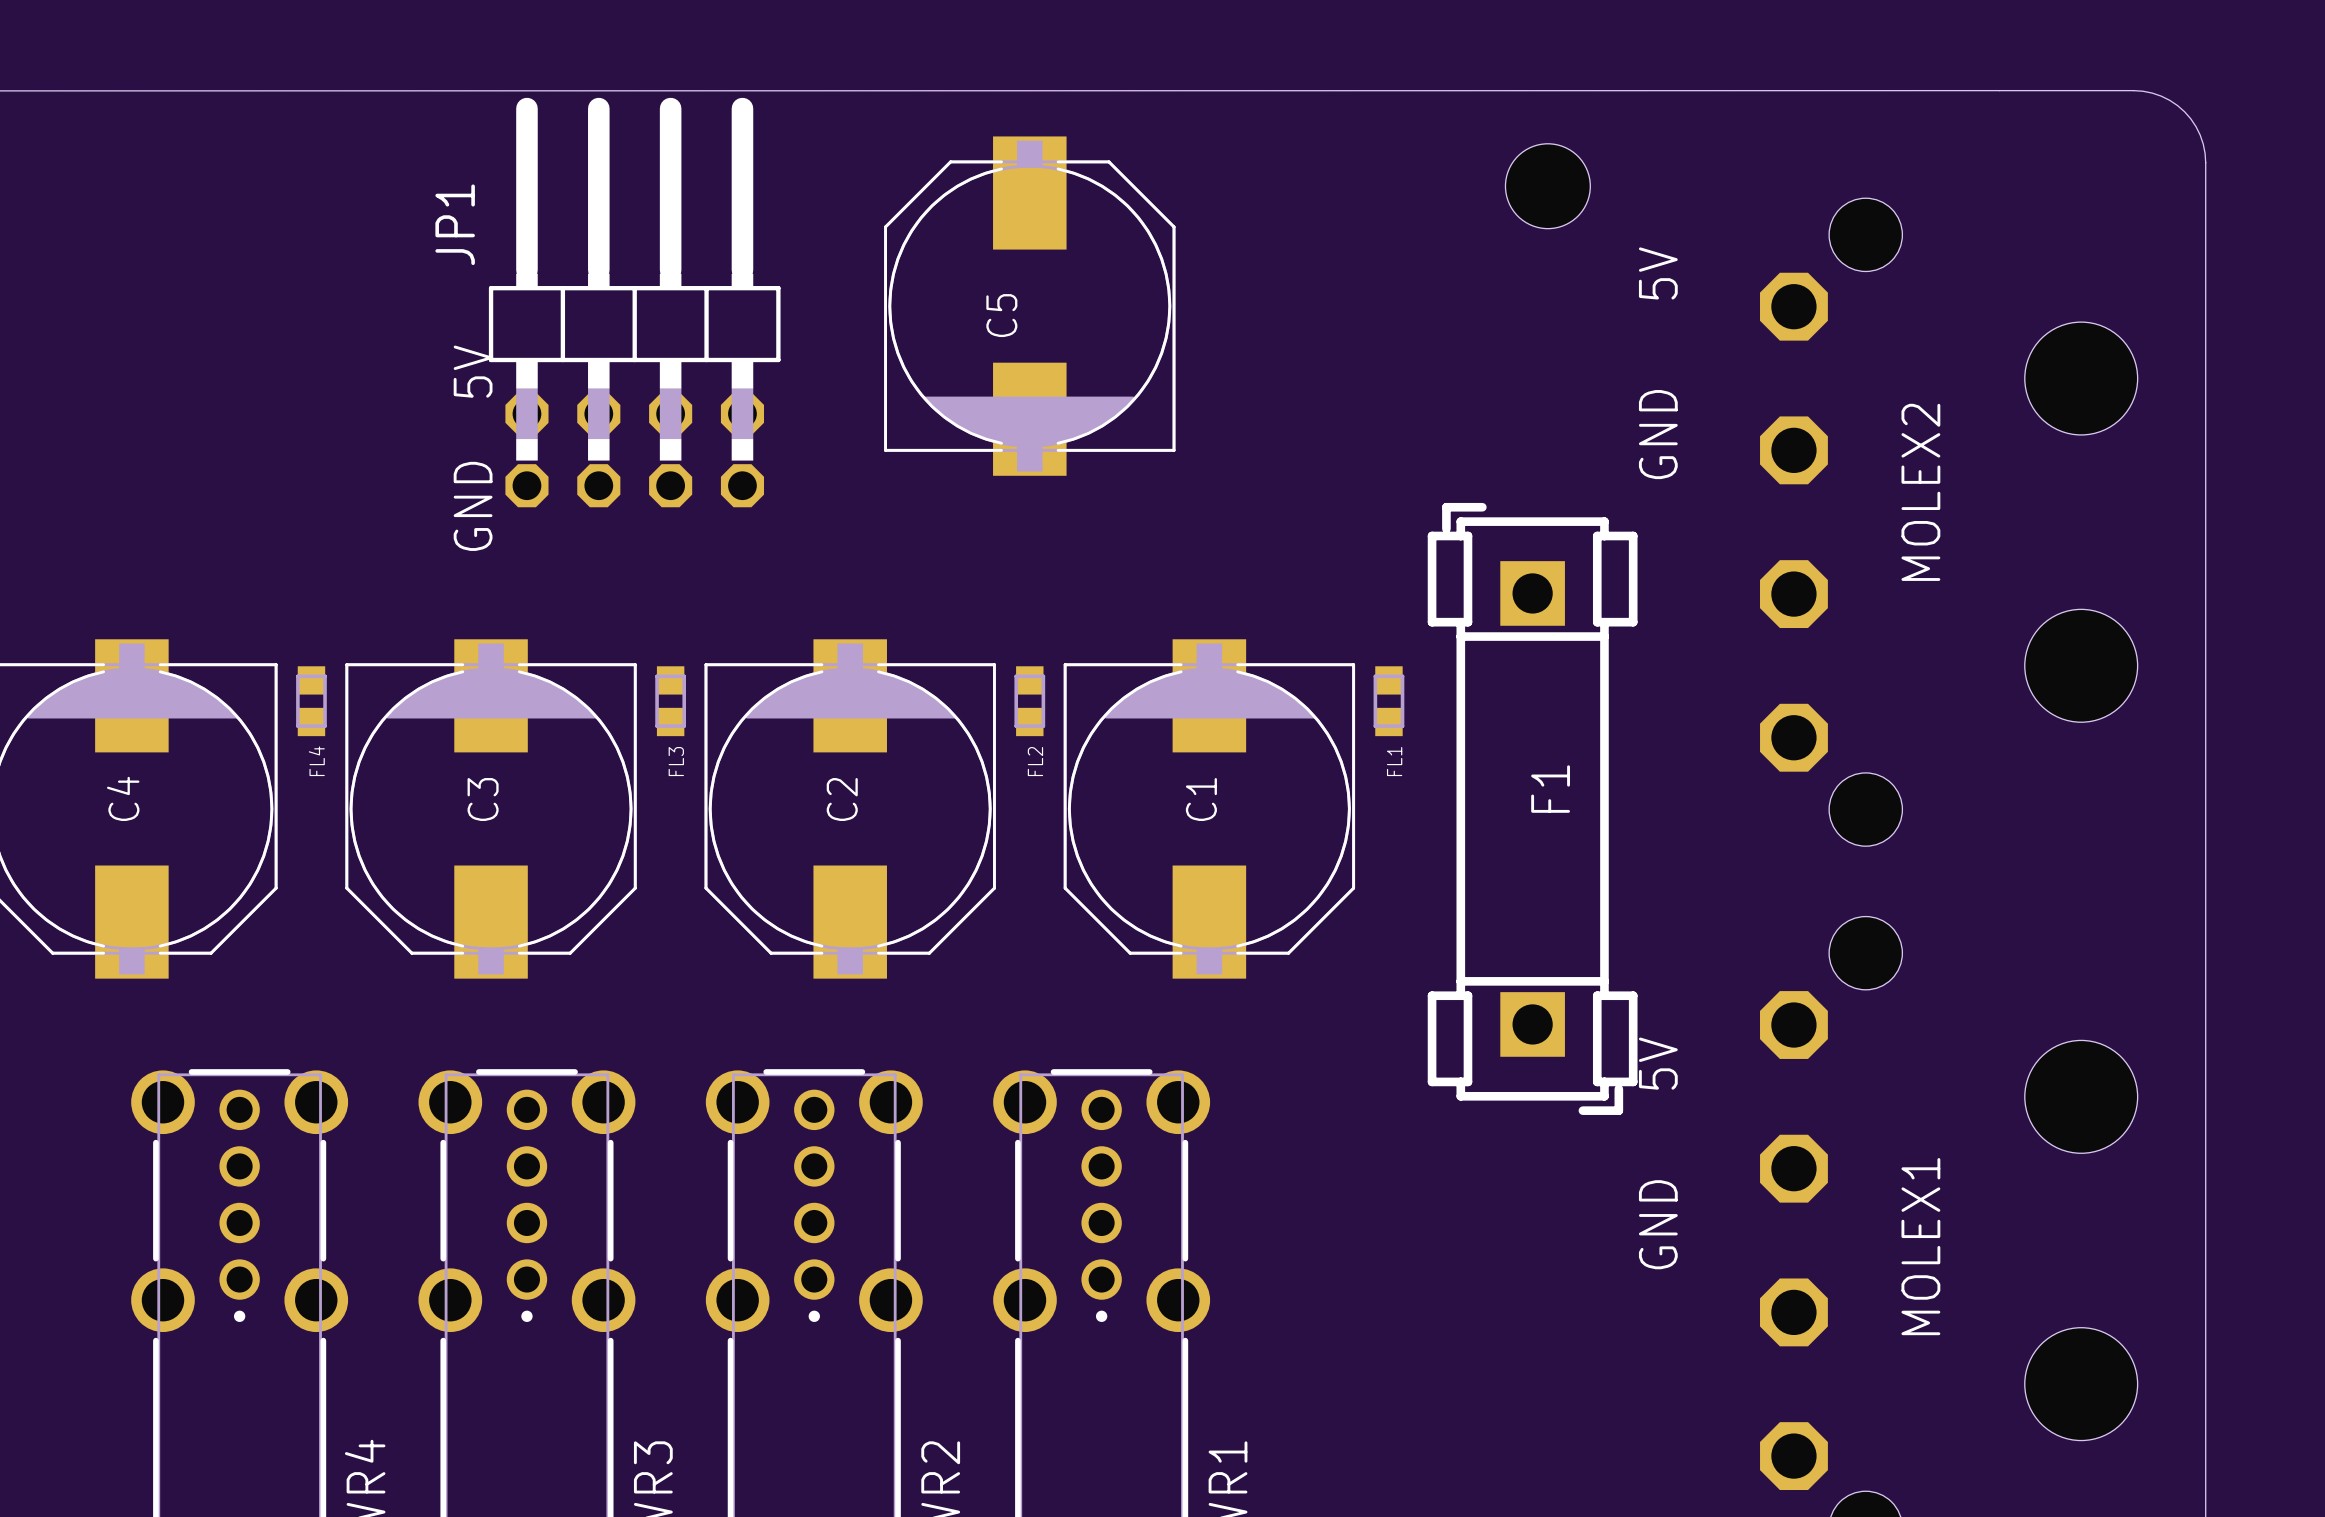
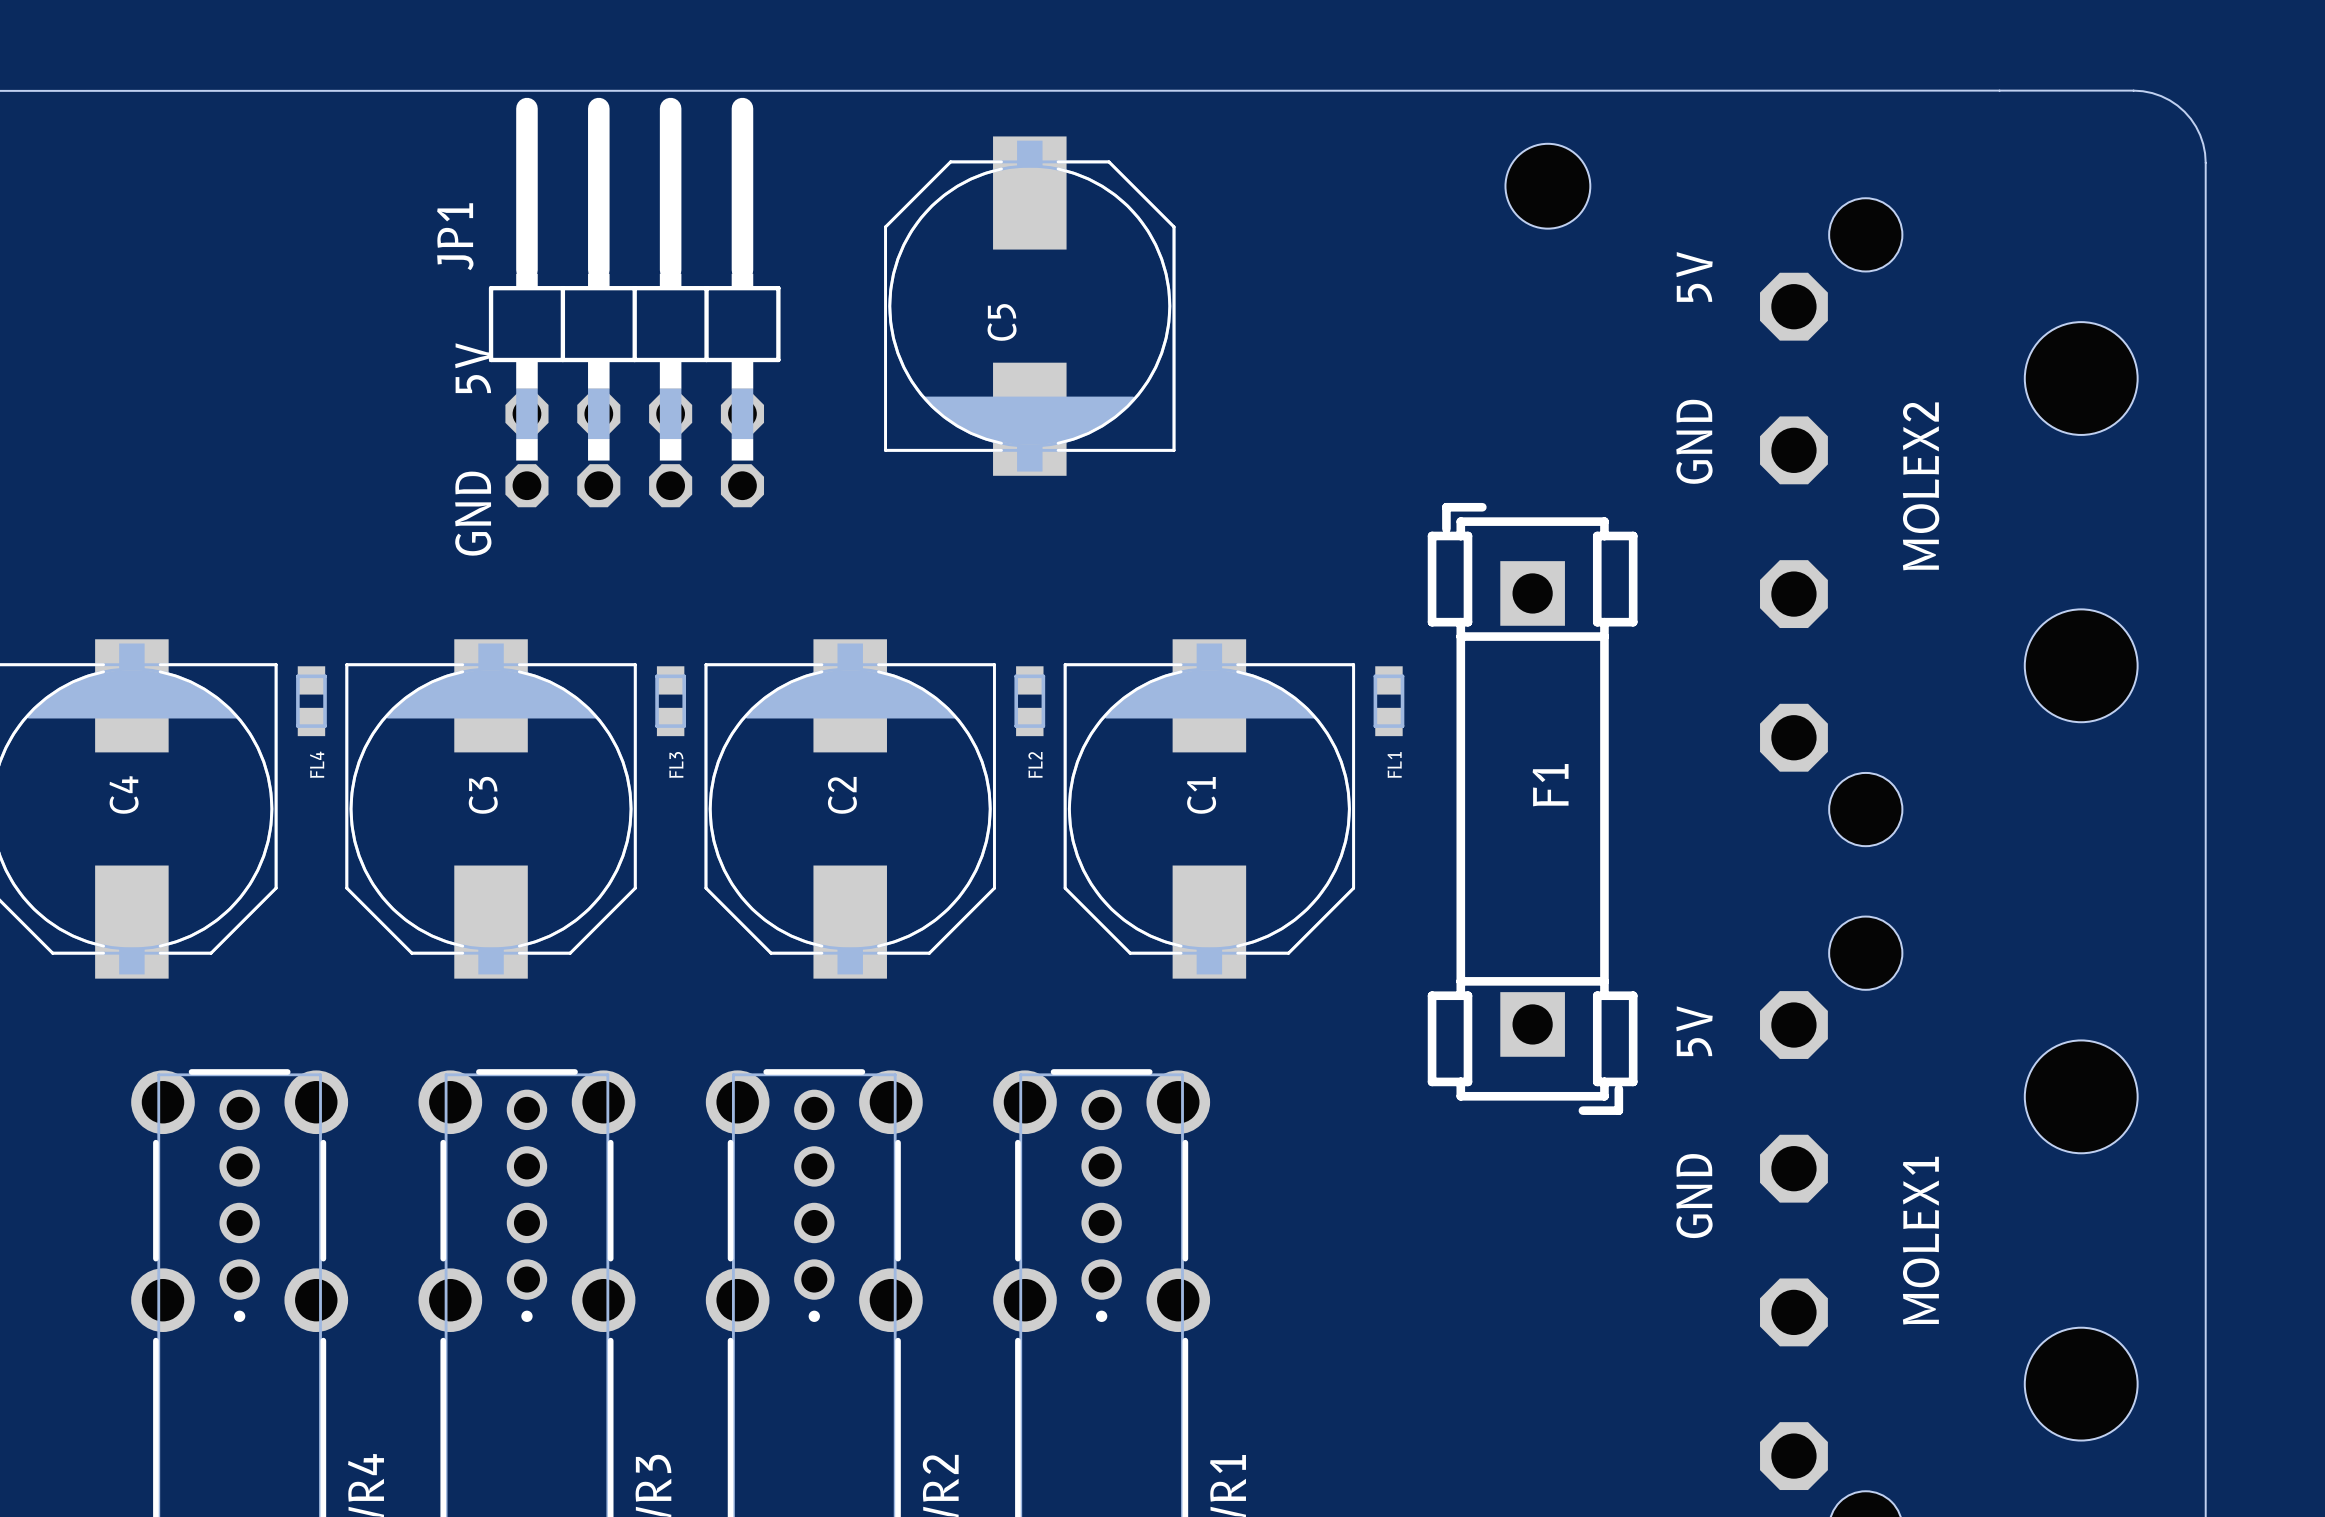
text position: 5V (1658, 273) -> 5V (1694, 276)
text position: GND (1658, 434) -> GND (1694, 441)
text position: 5V (1658, 1063) -> 5V (1694, 1031)
text position: GND (1658, 1224) -> GND (1694, 1196)

